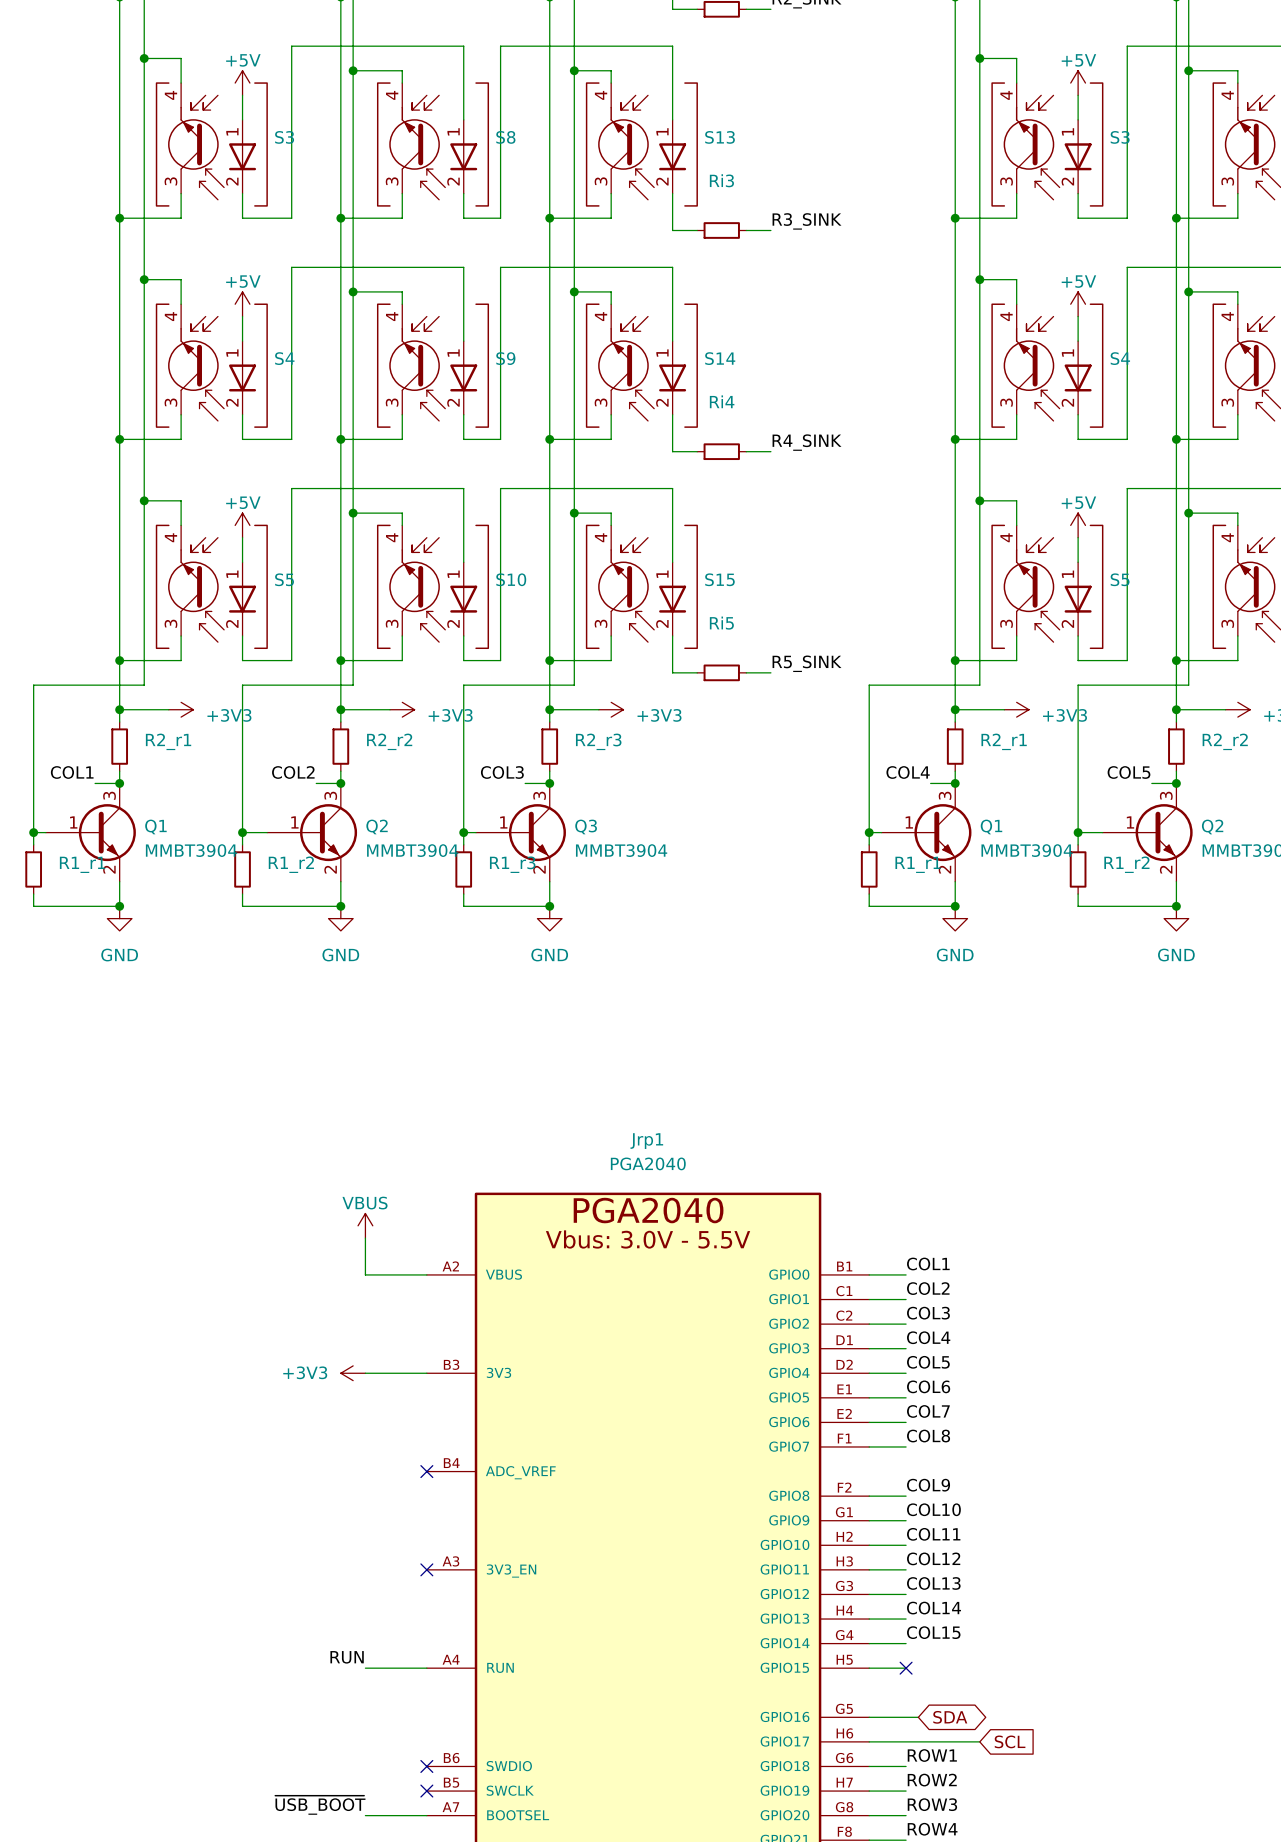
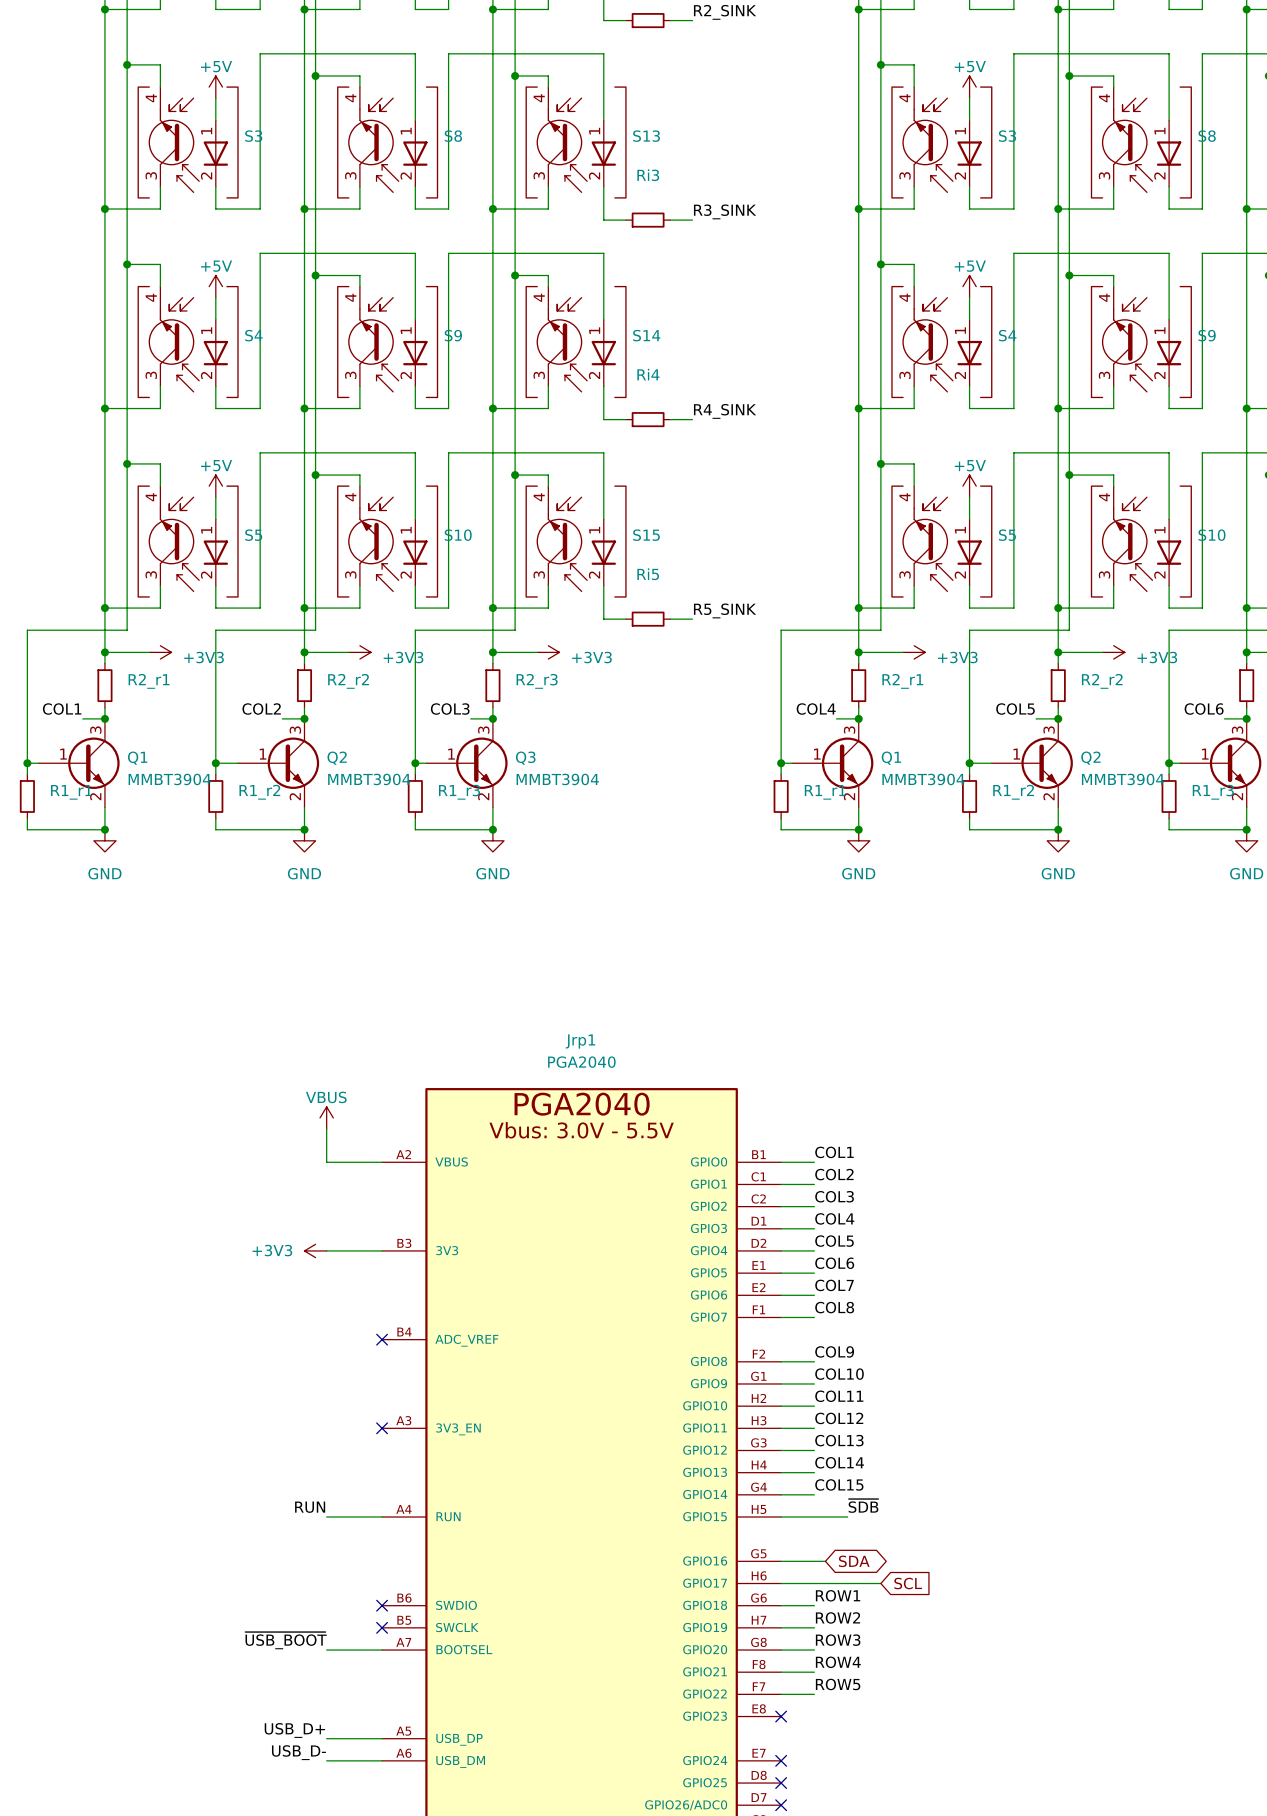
label: none -> ~{SDB} (863, 1505)
wire: none -> (814, 1517) (847, 1517)
no-connect mark: (906, 1668) -> none

